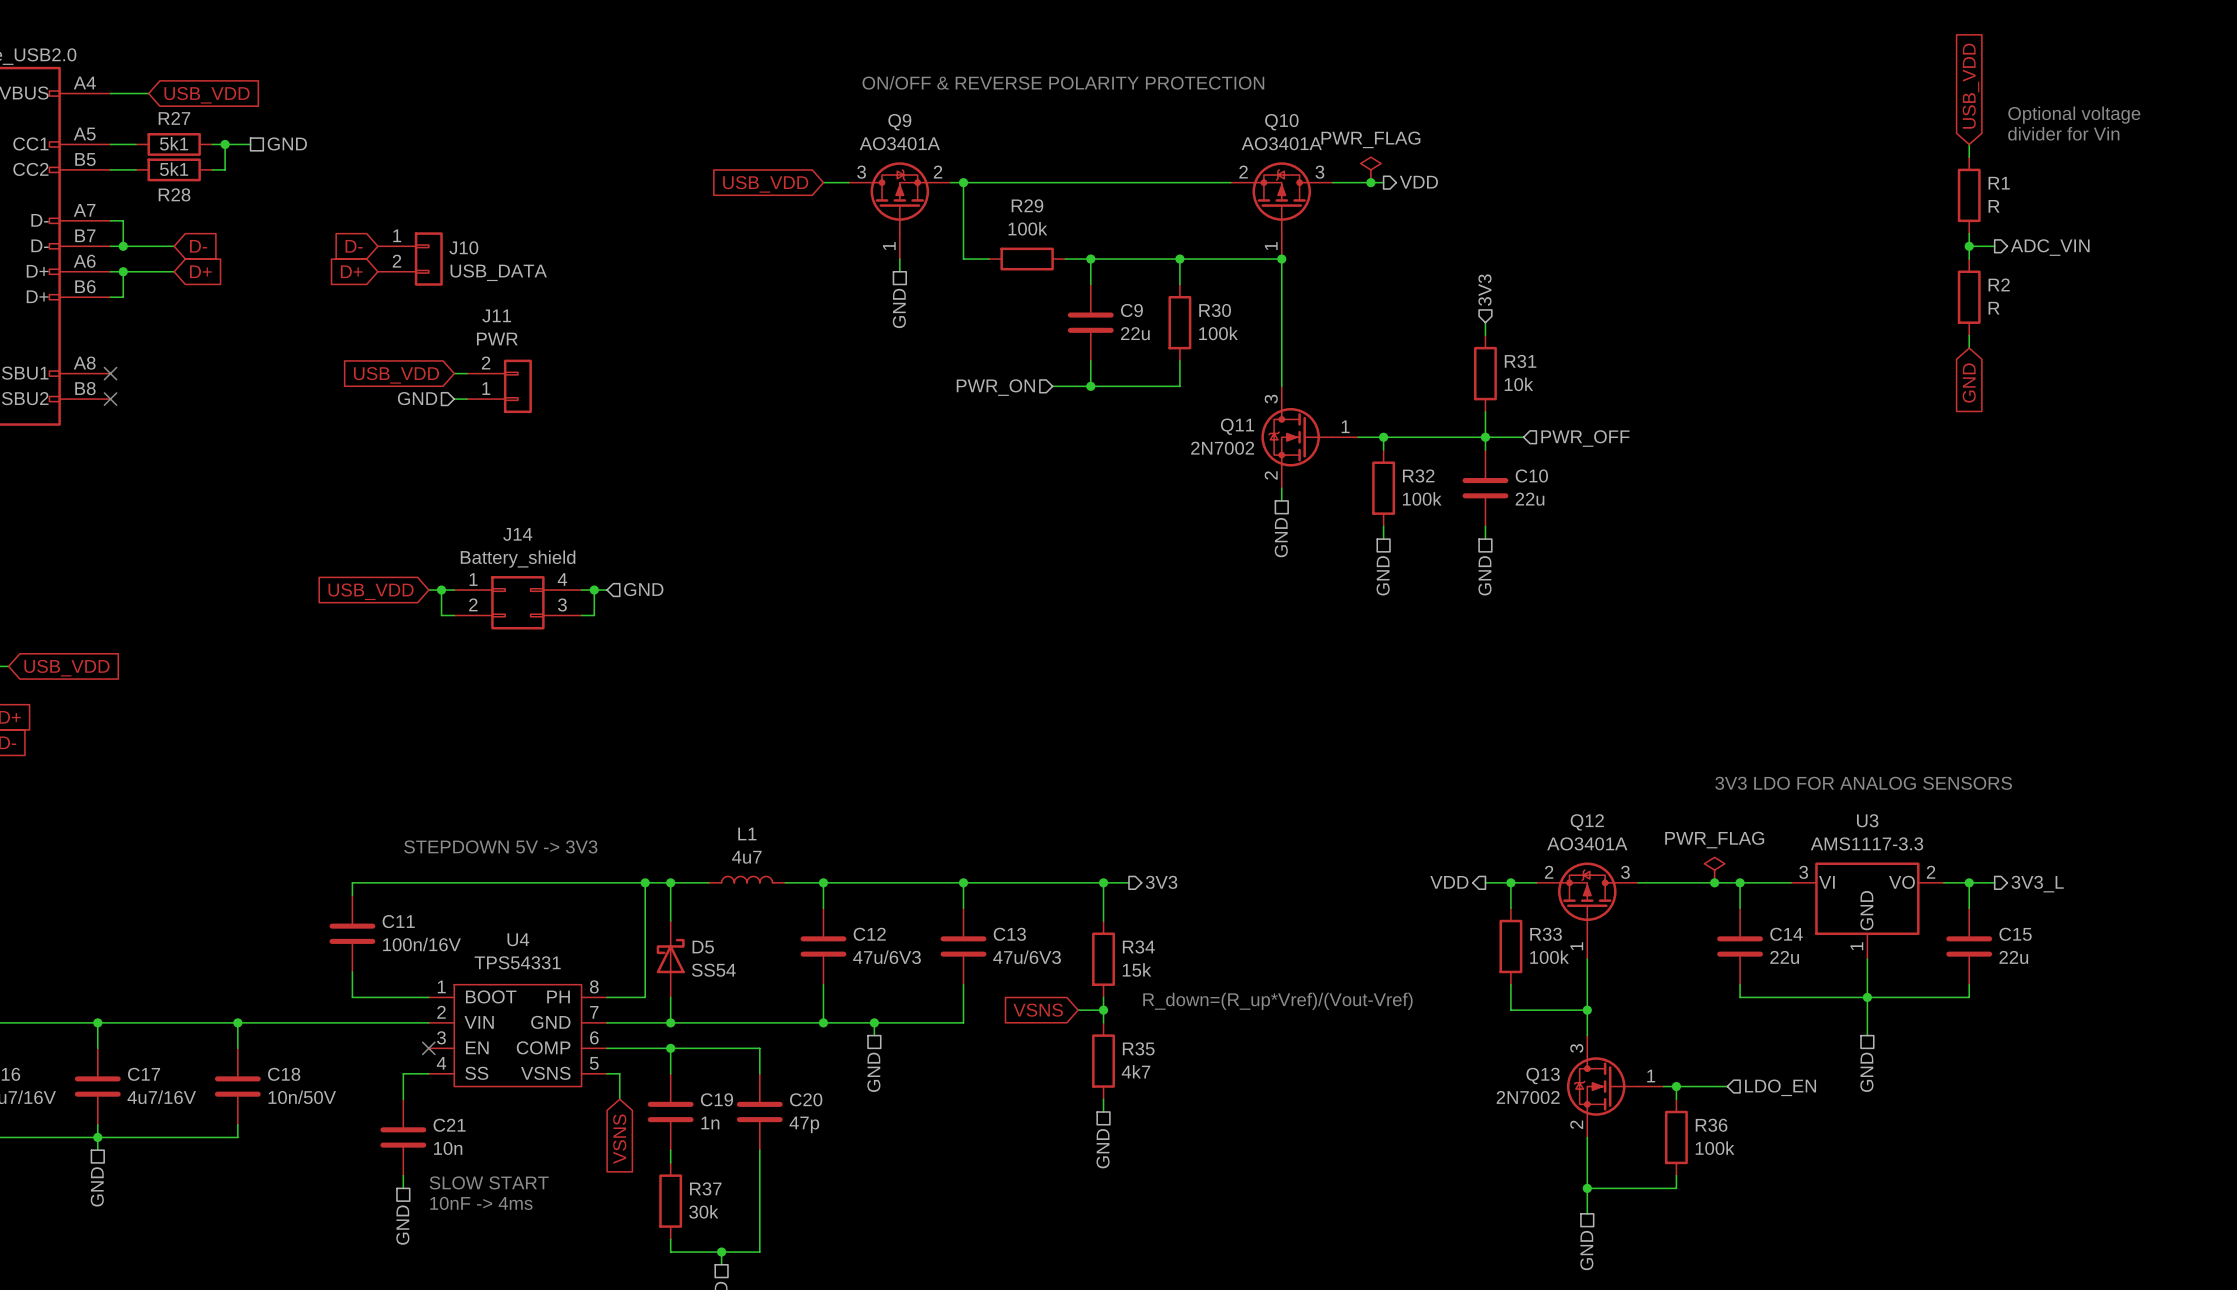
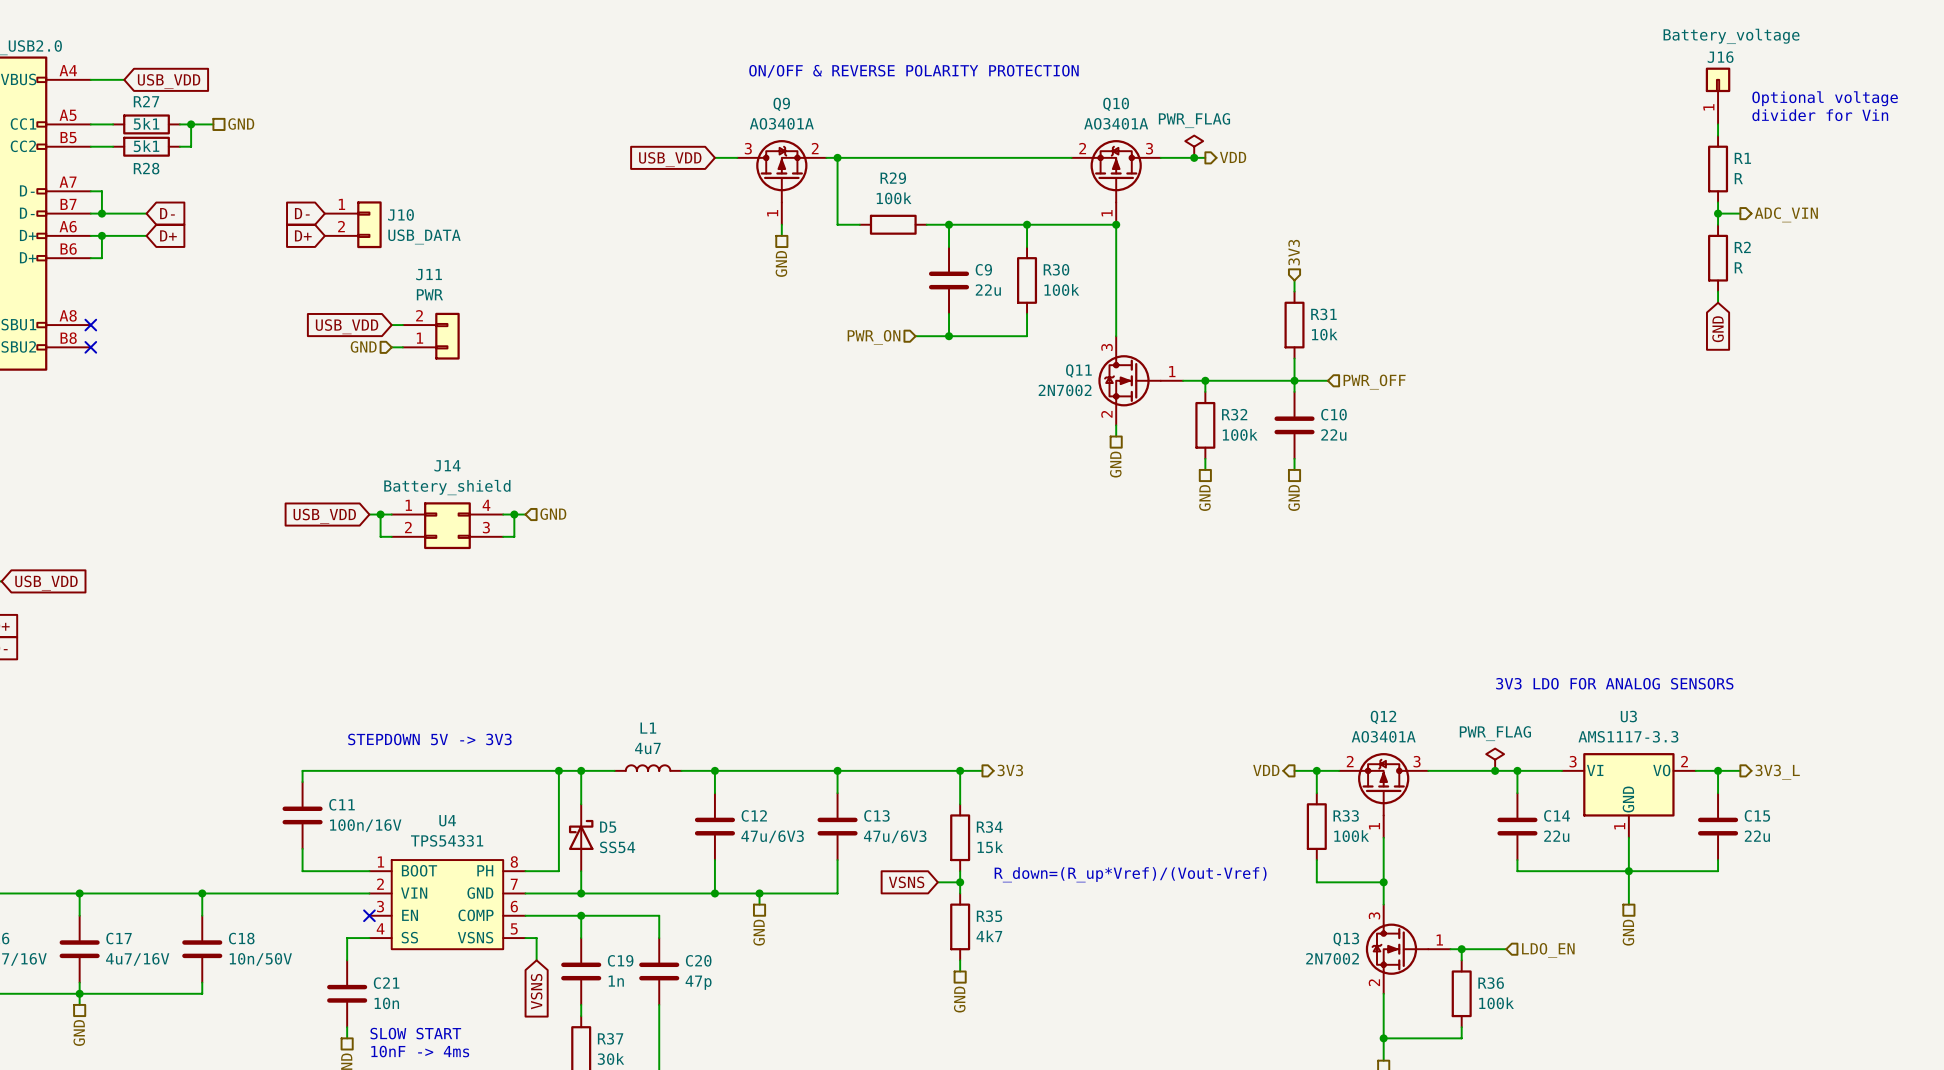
global label: USB_VDD (1970, 86) -> none
J16: none -> Battery_voltage (1718, 96)

